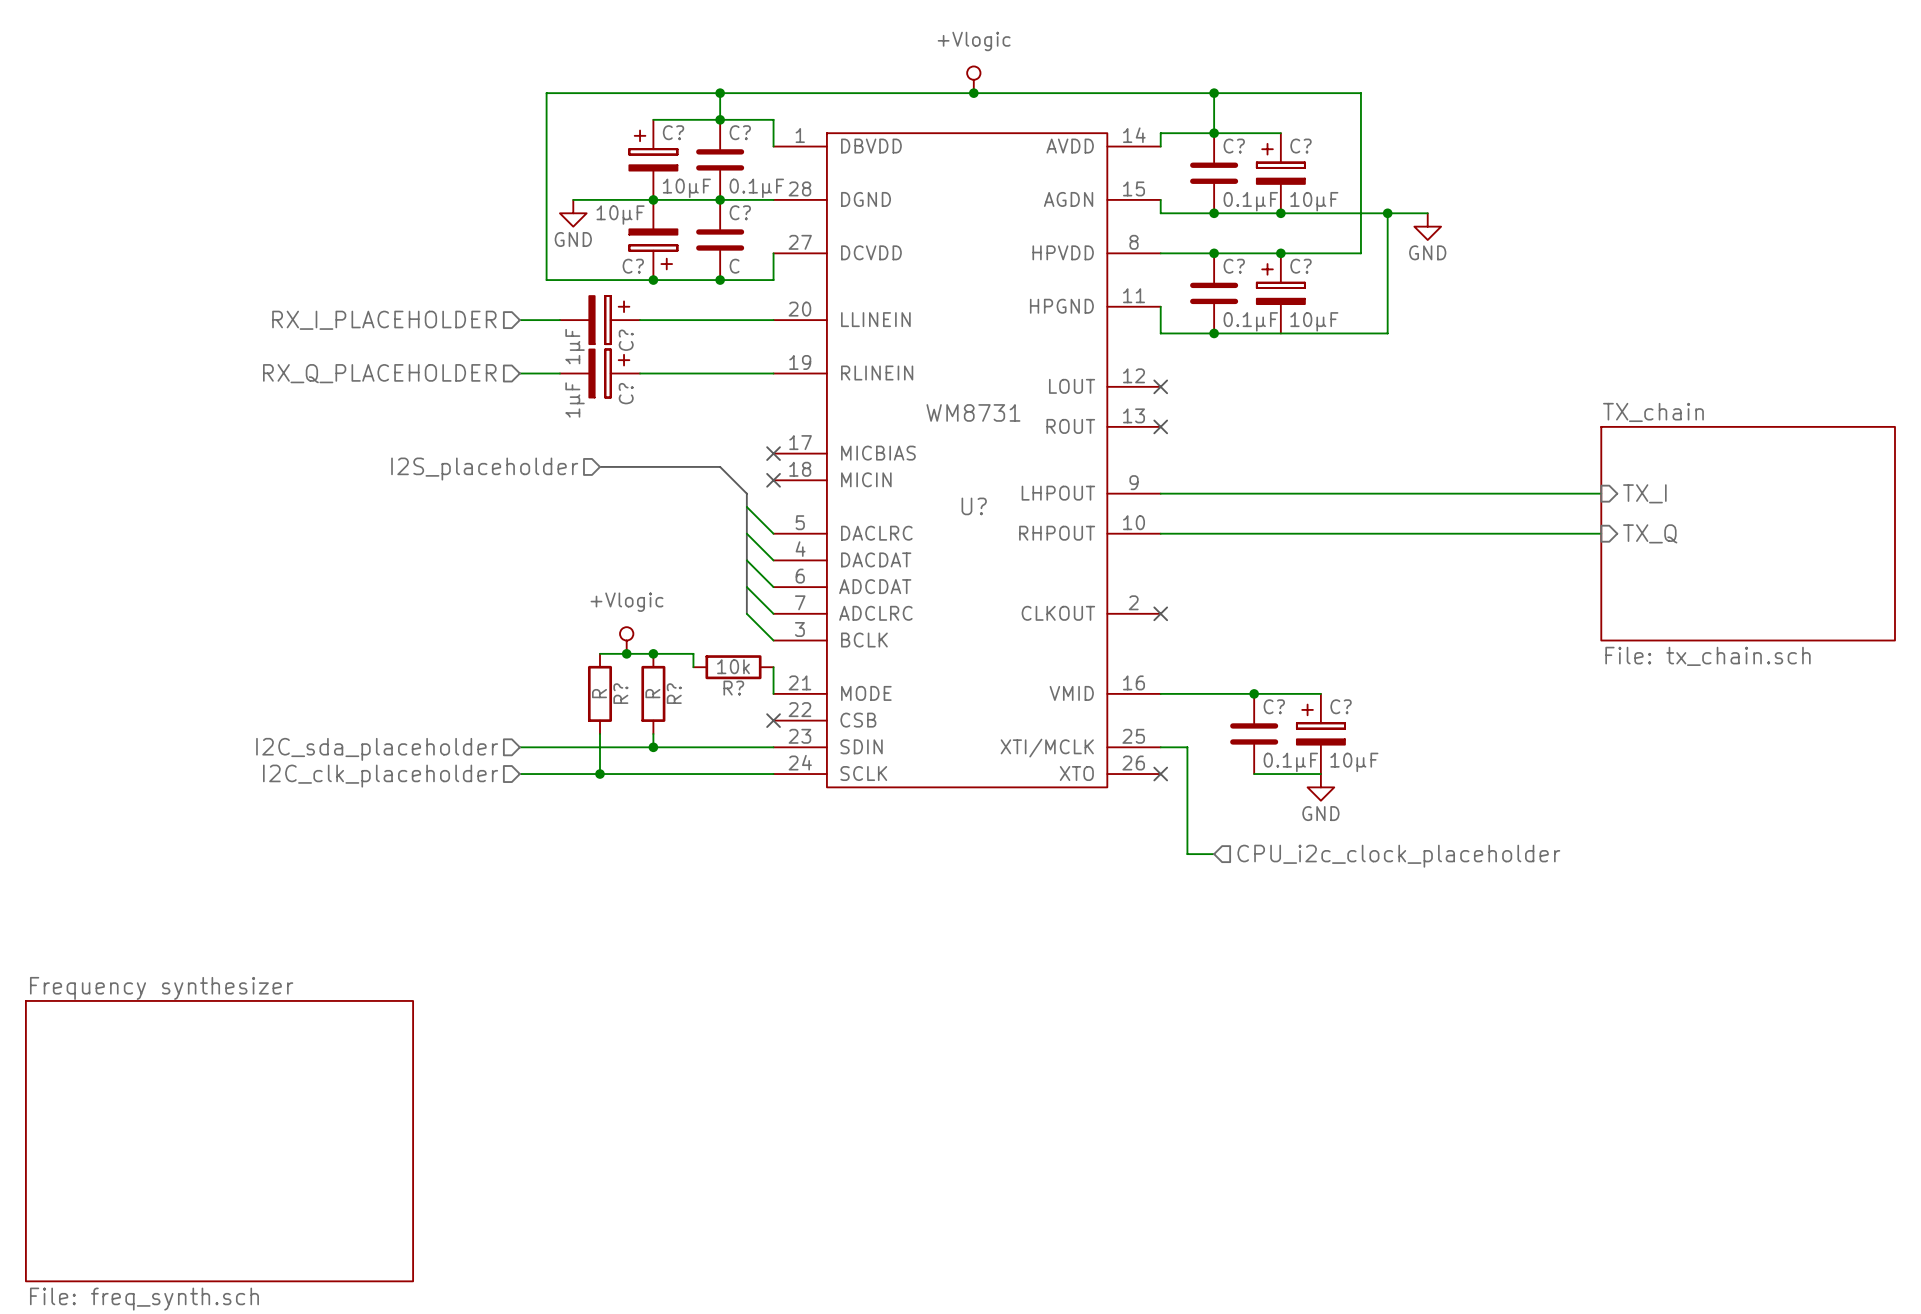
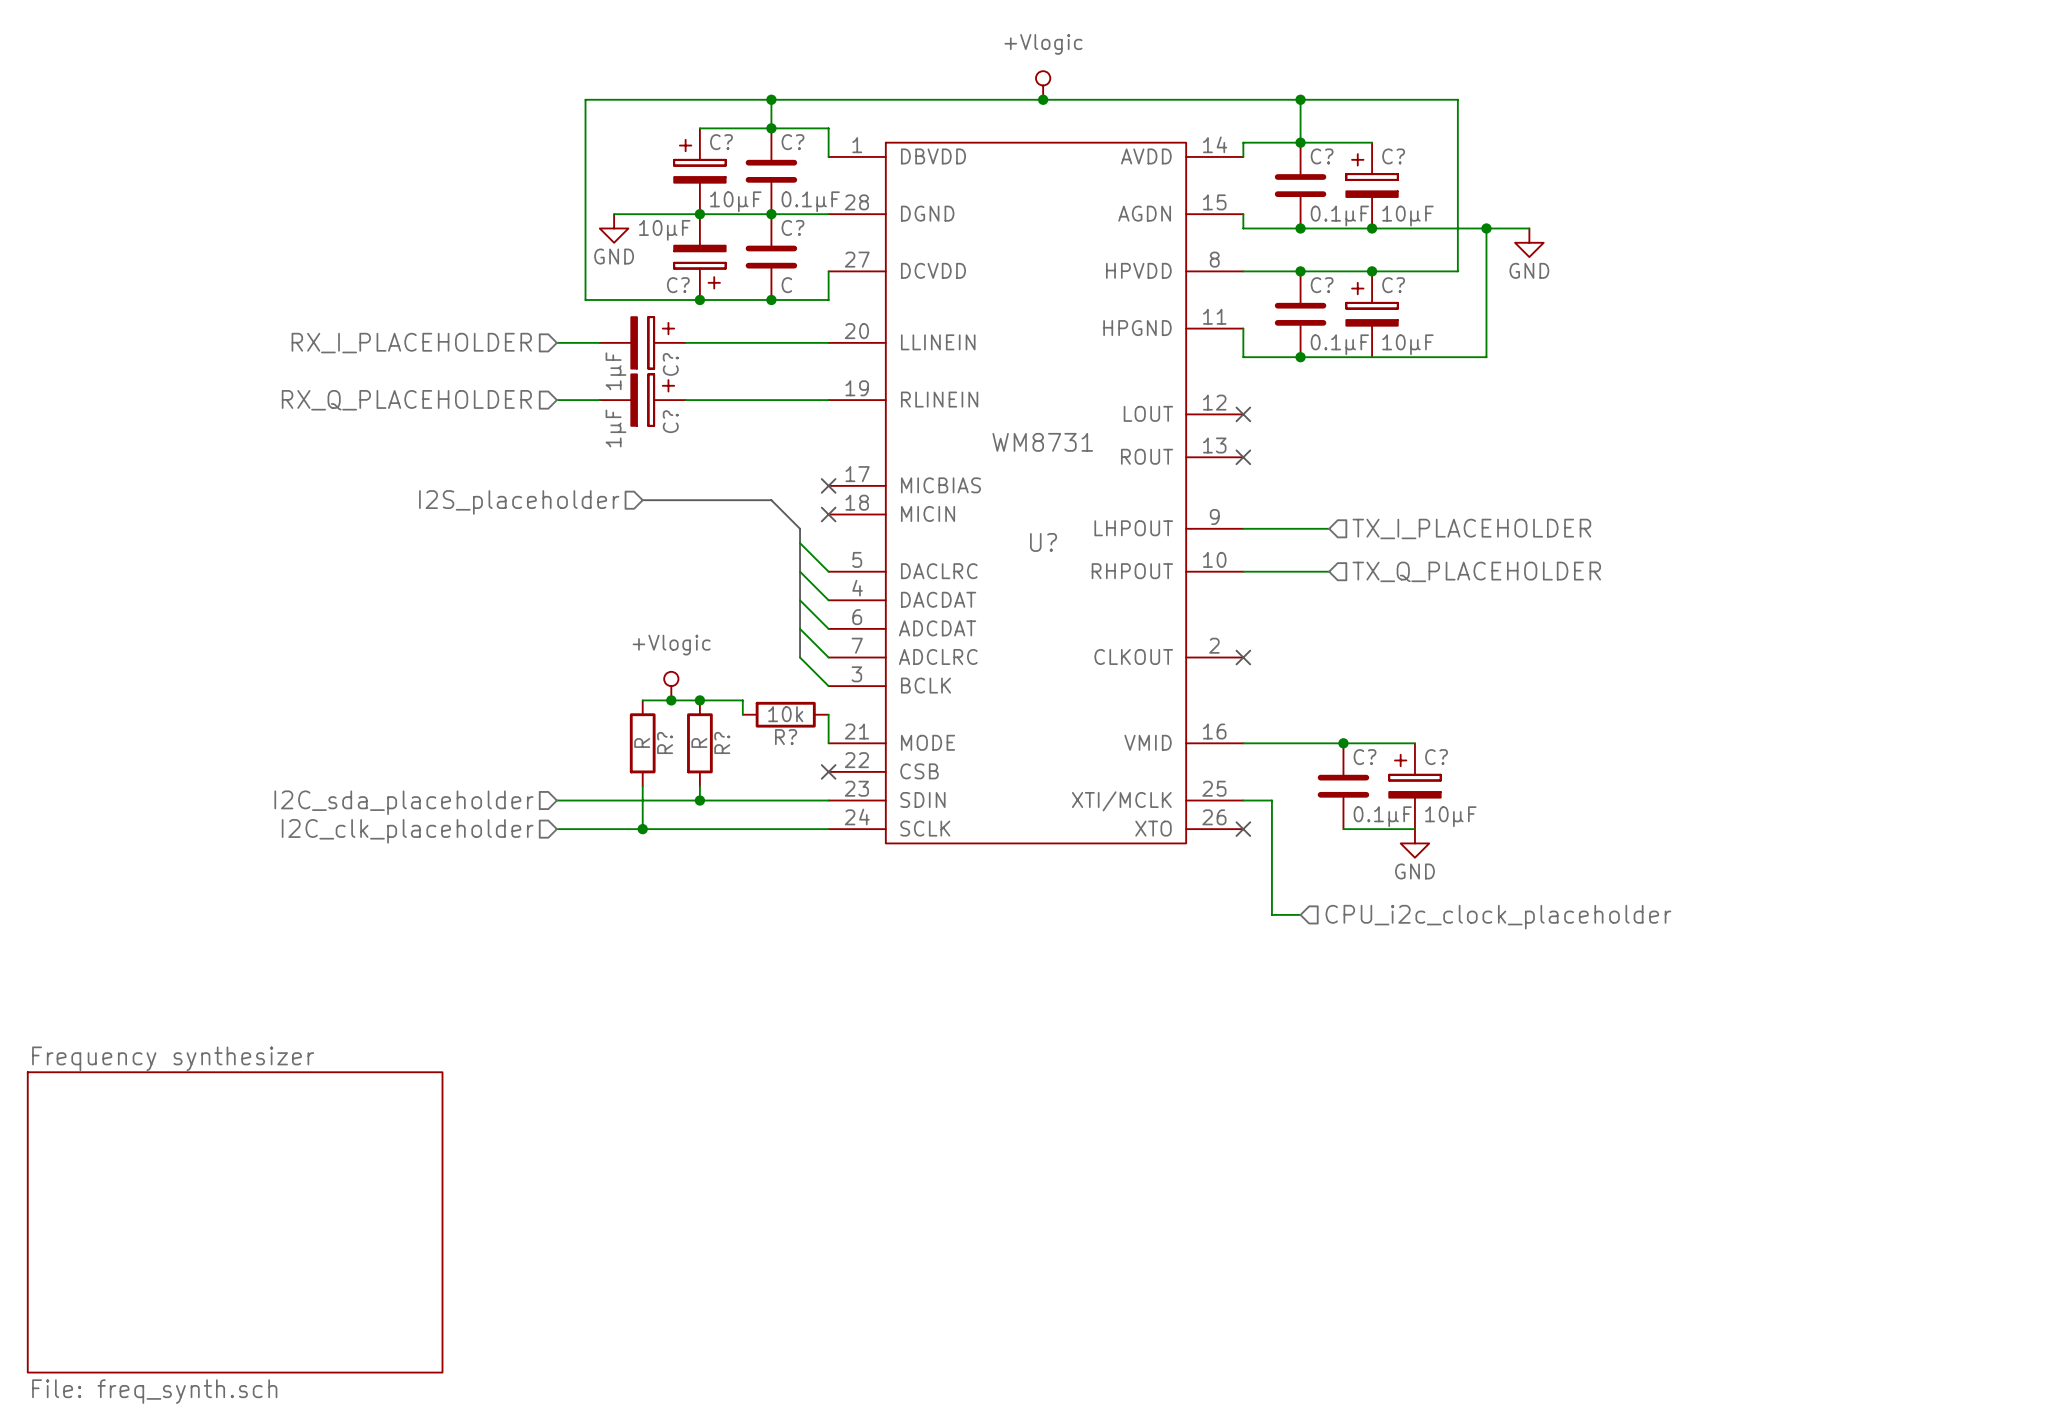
wire: (1240, 493) (1601, 493) -> none
hierarchical label: none -> TX_I_PLACEHOLDER (1471, 528)
sheet pin: TX_I (1644, 493) -> none
wire: (1240, 533) (1601, 533) -> none
hierarchical label: none -> TX_Q_PLACEHOLDER (1476, 571)
sheet pin: TX_Q (1650, 533) -> none
sheet TX_chain: File: tx_chain.sch (1748, 533) -> none

